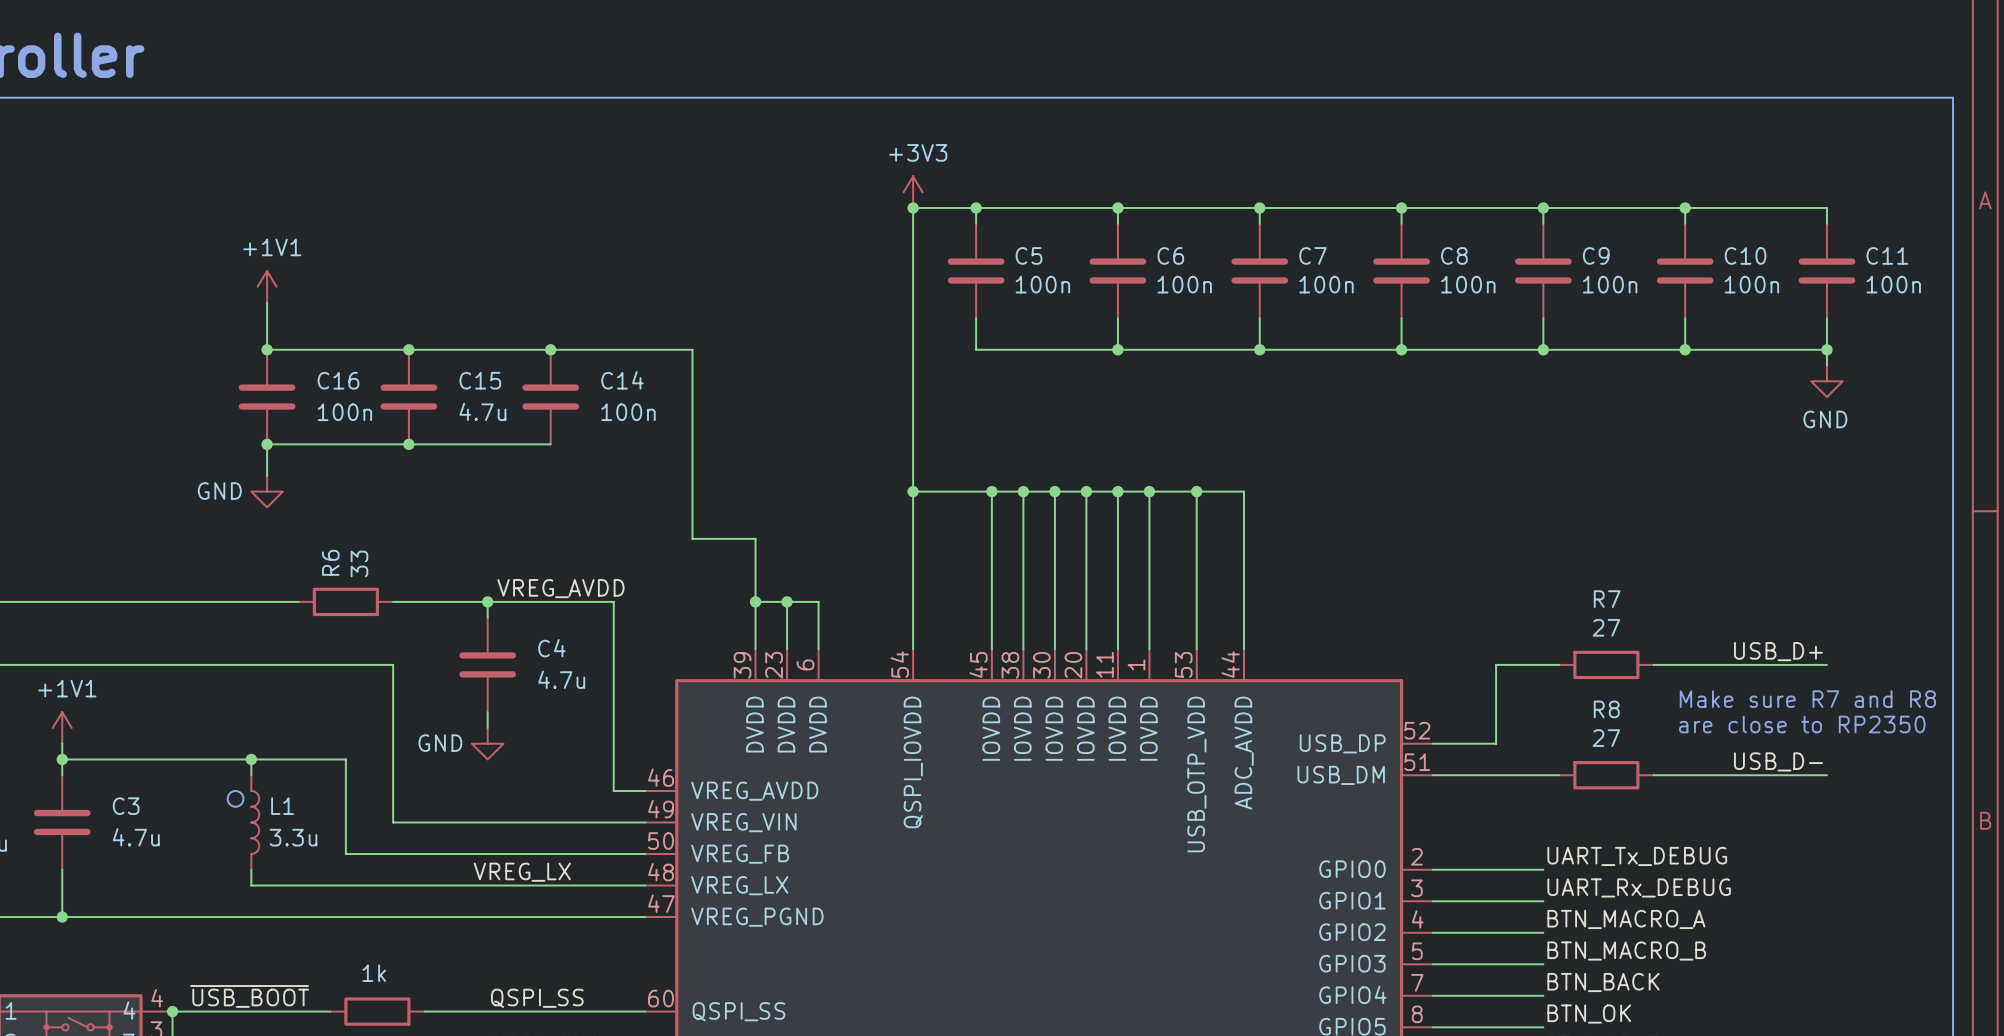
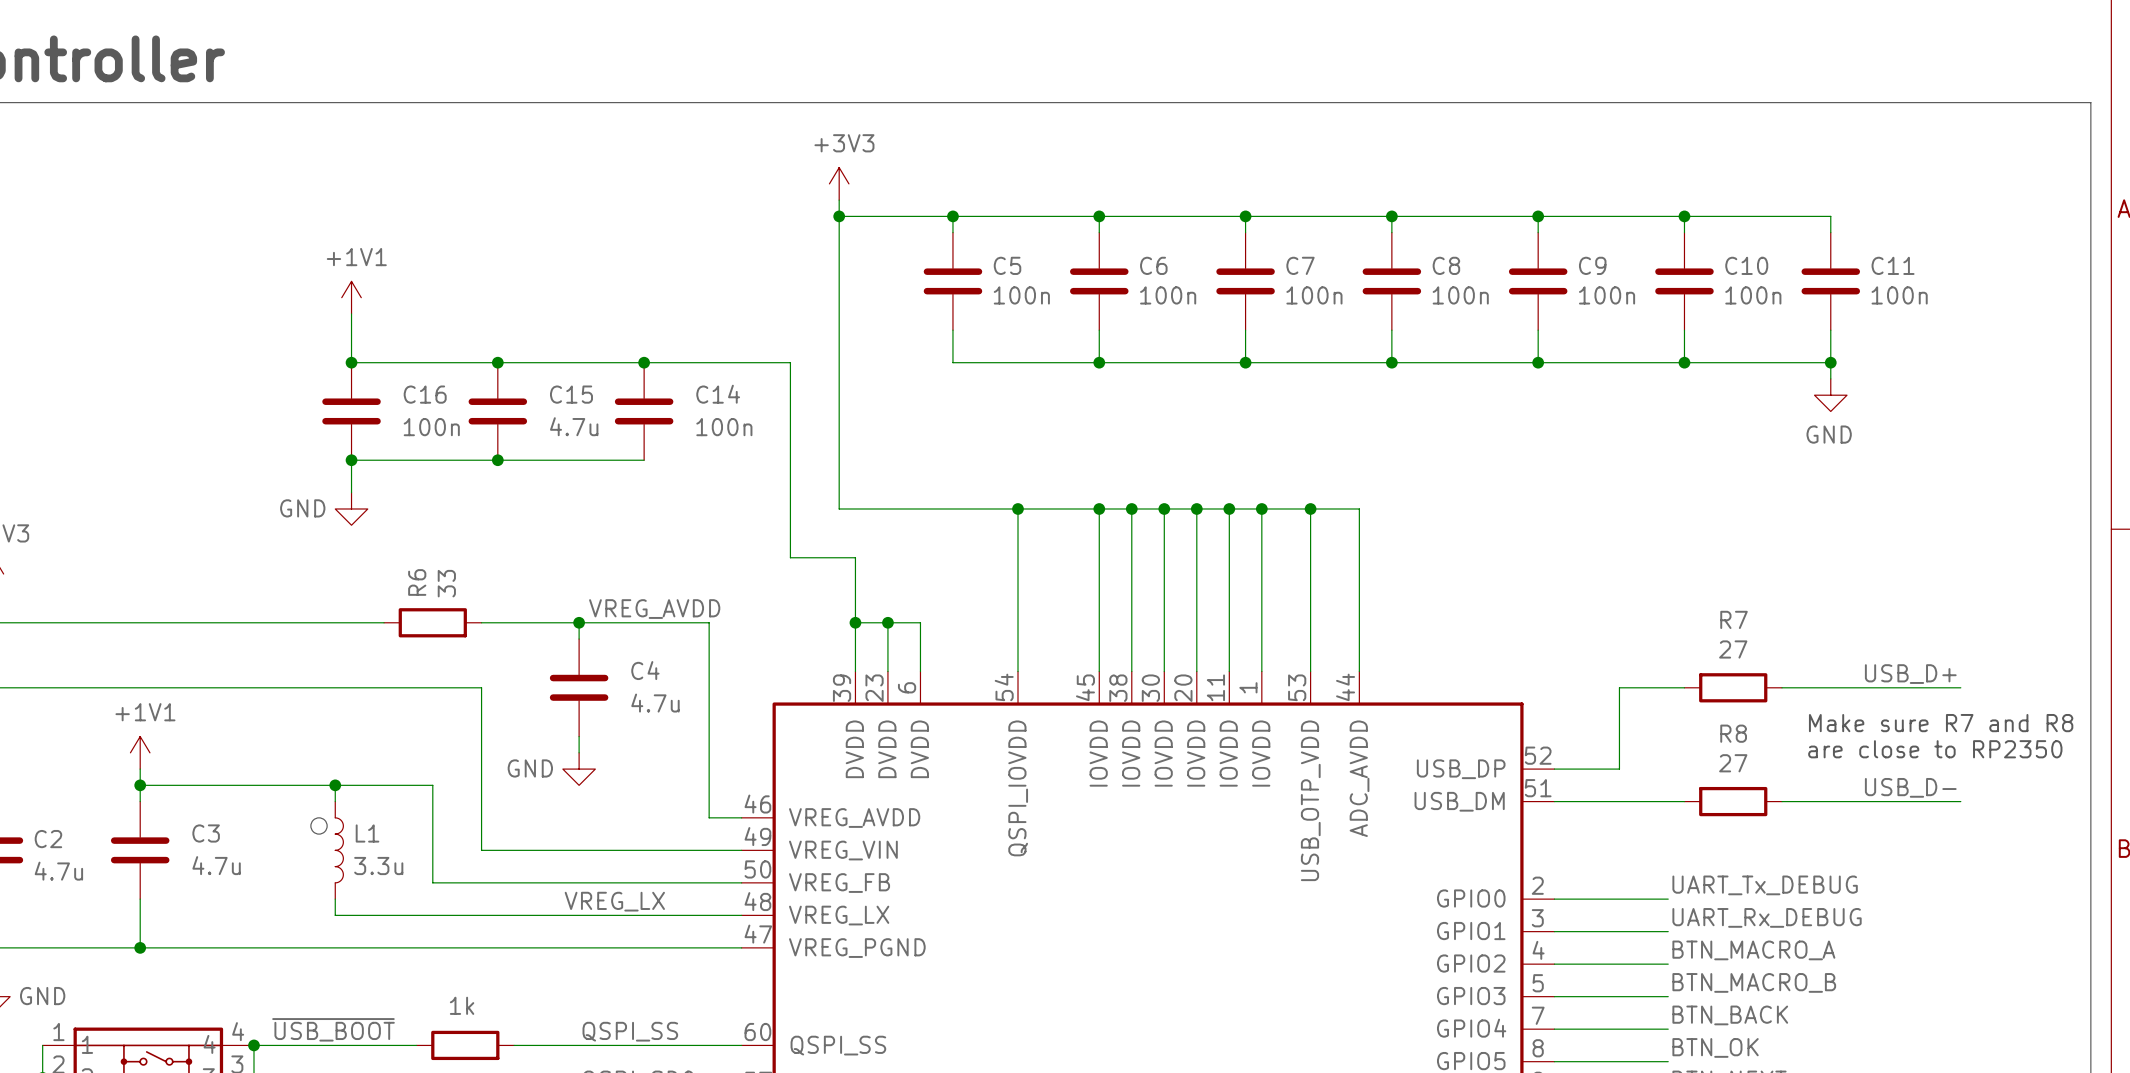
power symbol position: +3V3 (913, 192) -> +3V3 (839, 183)
wire: none -> (839, 216) (1018, 216)
junction: none -> (839, 216)
junction: none -> (952, 216)
wire: (913, 207) (913, 491) -> (839, 200) (839, 508) (1018, 508)
junction: (913, 207) -> none
wire: (976, 207) (976, 223) -> (952, 216) (952, 232)
junction position: (976, 207) -> (1099, 216)
wire: (1117, 207) (1117, 223) -> (1099, 216) (1099, 232)
junction position: (1117, 207) -> (1245, 216)
wire: (1259, 207) (1259, 223) -> (1245, 216) (1245, 232)
junction position: (1259, 207) -> (1391, 216)
wire: (1401, 207) (1401, 223) -> (1391, 216) (1391, 232)
junction position: (1401, 207) -> (1538, 216)
wire: (1543, 207) (1543, 223) -> (1538, 216) (1538, 232)
junction position: (1543, 207) -> (1684, 216)
wire: (1685, 207) (1685, 223) -> (1684, 216) (1684, 232)
junction: (1685, 207) -> none
wire: (1700, 207) (1826, 207) (1826, 223) -> (1830, 216) (1830, 232)
C5 position: (976, 271) -> (952, 281)
C6 position: (1117, 271) -> (1099, 281)
C7 position: (1259, 271) -> (1245, 281)
C8 position: (1401, 271) -> (1391, 281)
C9 position: (1543, 271) -> (1538, 281)
C10 position: (1685, 271) -> (1684, 281)
C11 position: (1826, 271) -> (1830, 281)
wire: (976, 318) (976, 349) -> (952, 330) (952, 362) (1083, 362)
wire: (1117, 318) (1117, 349) -> (1099, 330) (1099, 362)
wire: (1259, 318) (1259, 349) -> (1245, 330) (1245, 362)
wire: (1401, 318) (1401, 349) -> (1391, 330) (1391, 362)
wire: (1543, 318) (1543, 349) -> (1538, 330) (1538, 362)
wire: (1685, 318) (1685, 349) -> (1684, 330) (1684, 362)
wire: (1826, 318) (1826, 365) -> (1830, 330) (1830, 378)
junction: none -> (1099, 362)
junction position: (1117, 349) -> (1245, 362)
junction position: (1259, 349) -> (1391, 362)
junction position: (1401, 349) -> (1538, 362)
junction position: (1543, 349) -> (1684, 362)
junction position: (1685, 349) -> (1830, 362)
wire: (1700, 349) (1826, 349) -> none
junction: (1826, 349) -> none
power symbol position: GND (1826, 381) -> GND (1830, 395)

